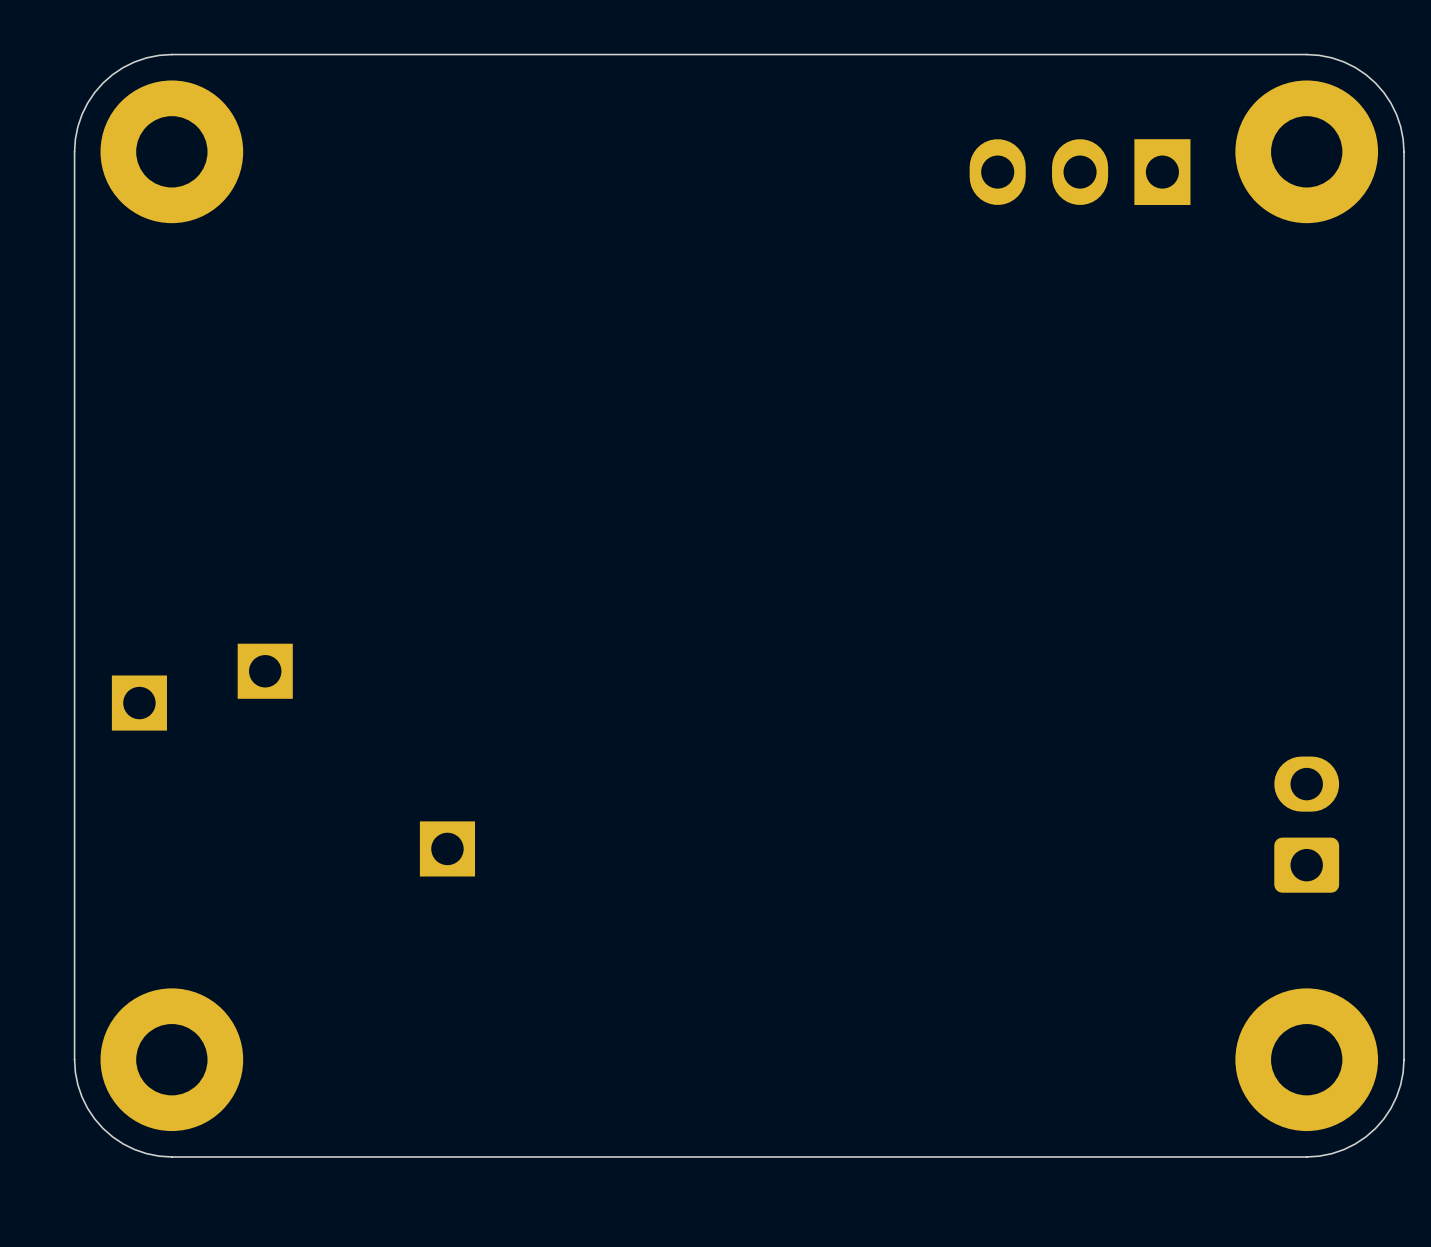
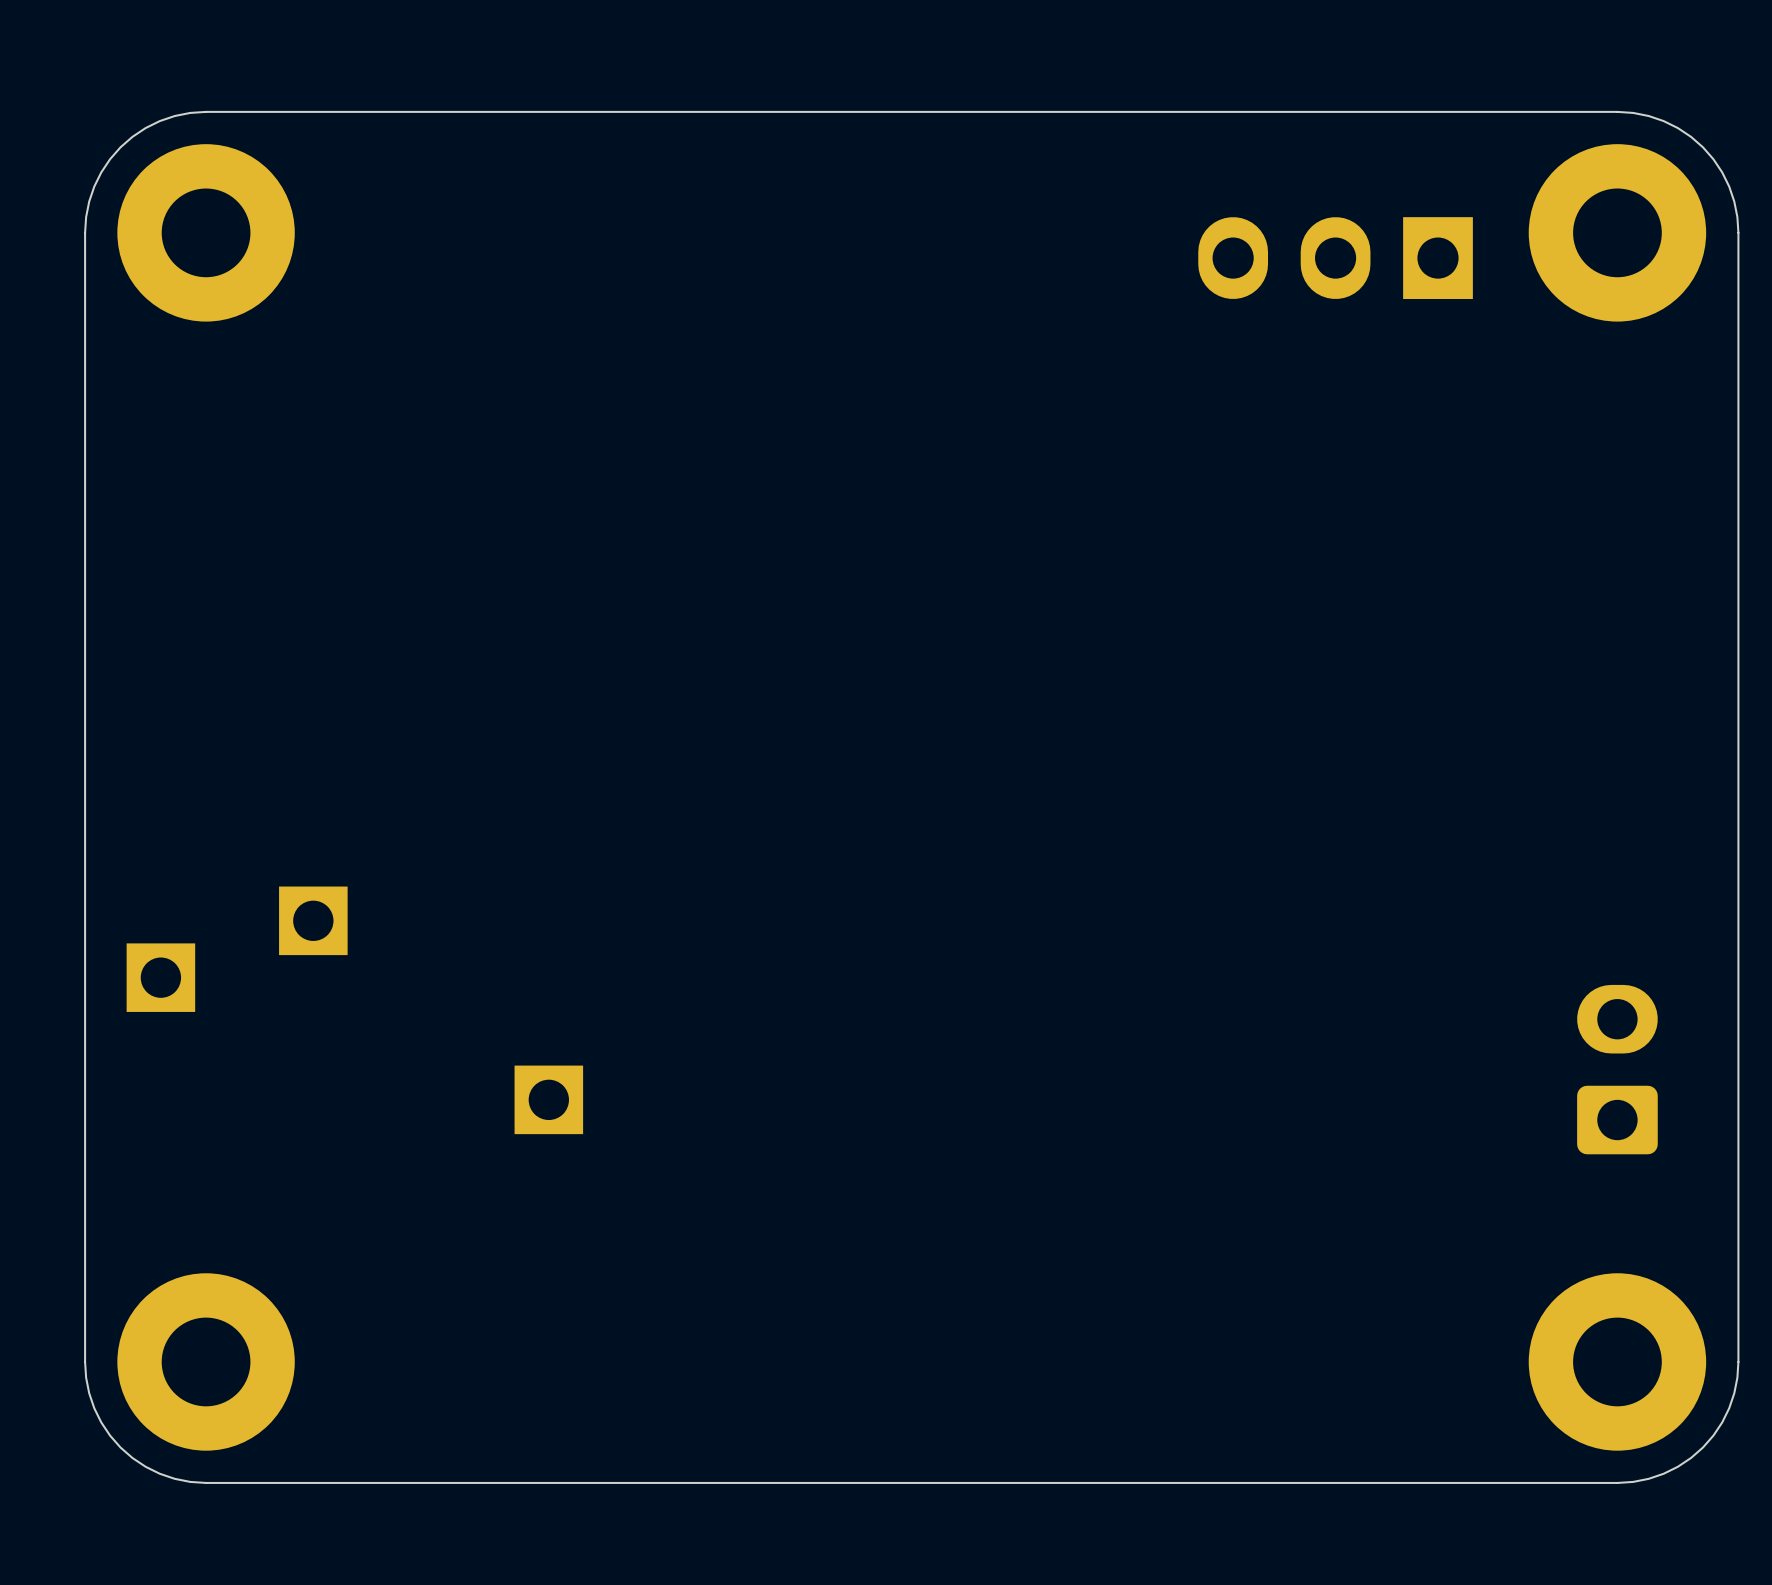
part position: (265, 671) -> (313, 920)
part position: (139, 703) -> (160, 977)

